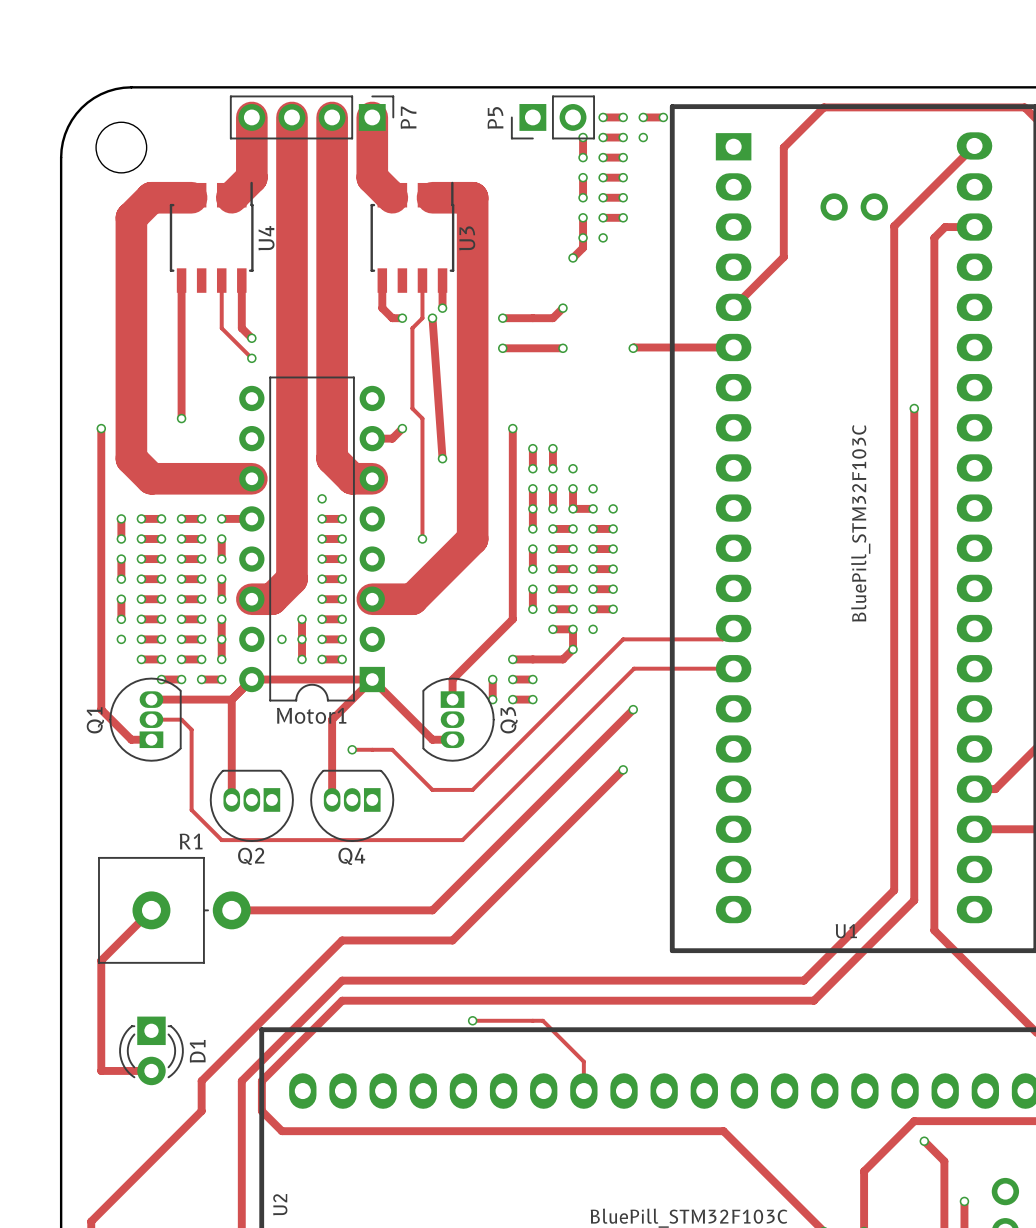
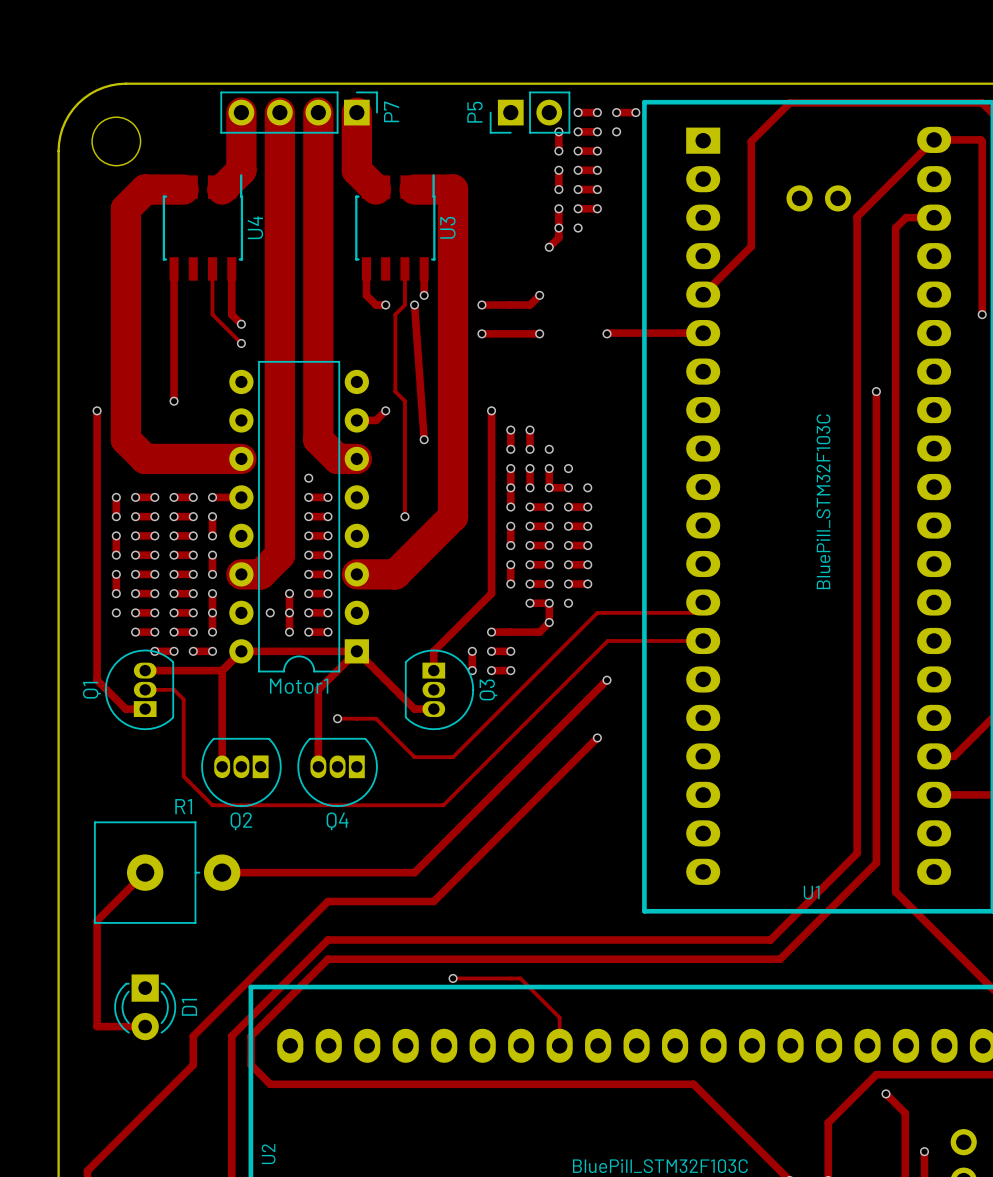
track: none -> (934, 139) (982, 141) (982, 314)
via: none -> (982, 314)

